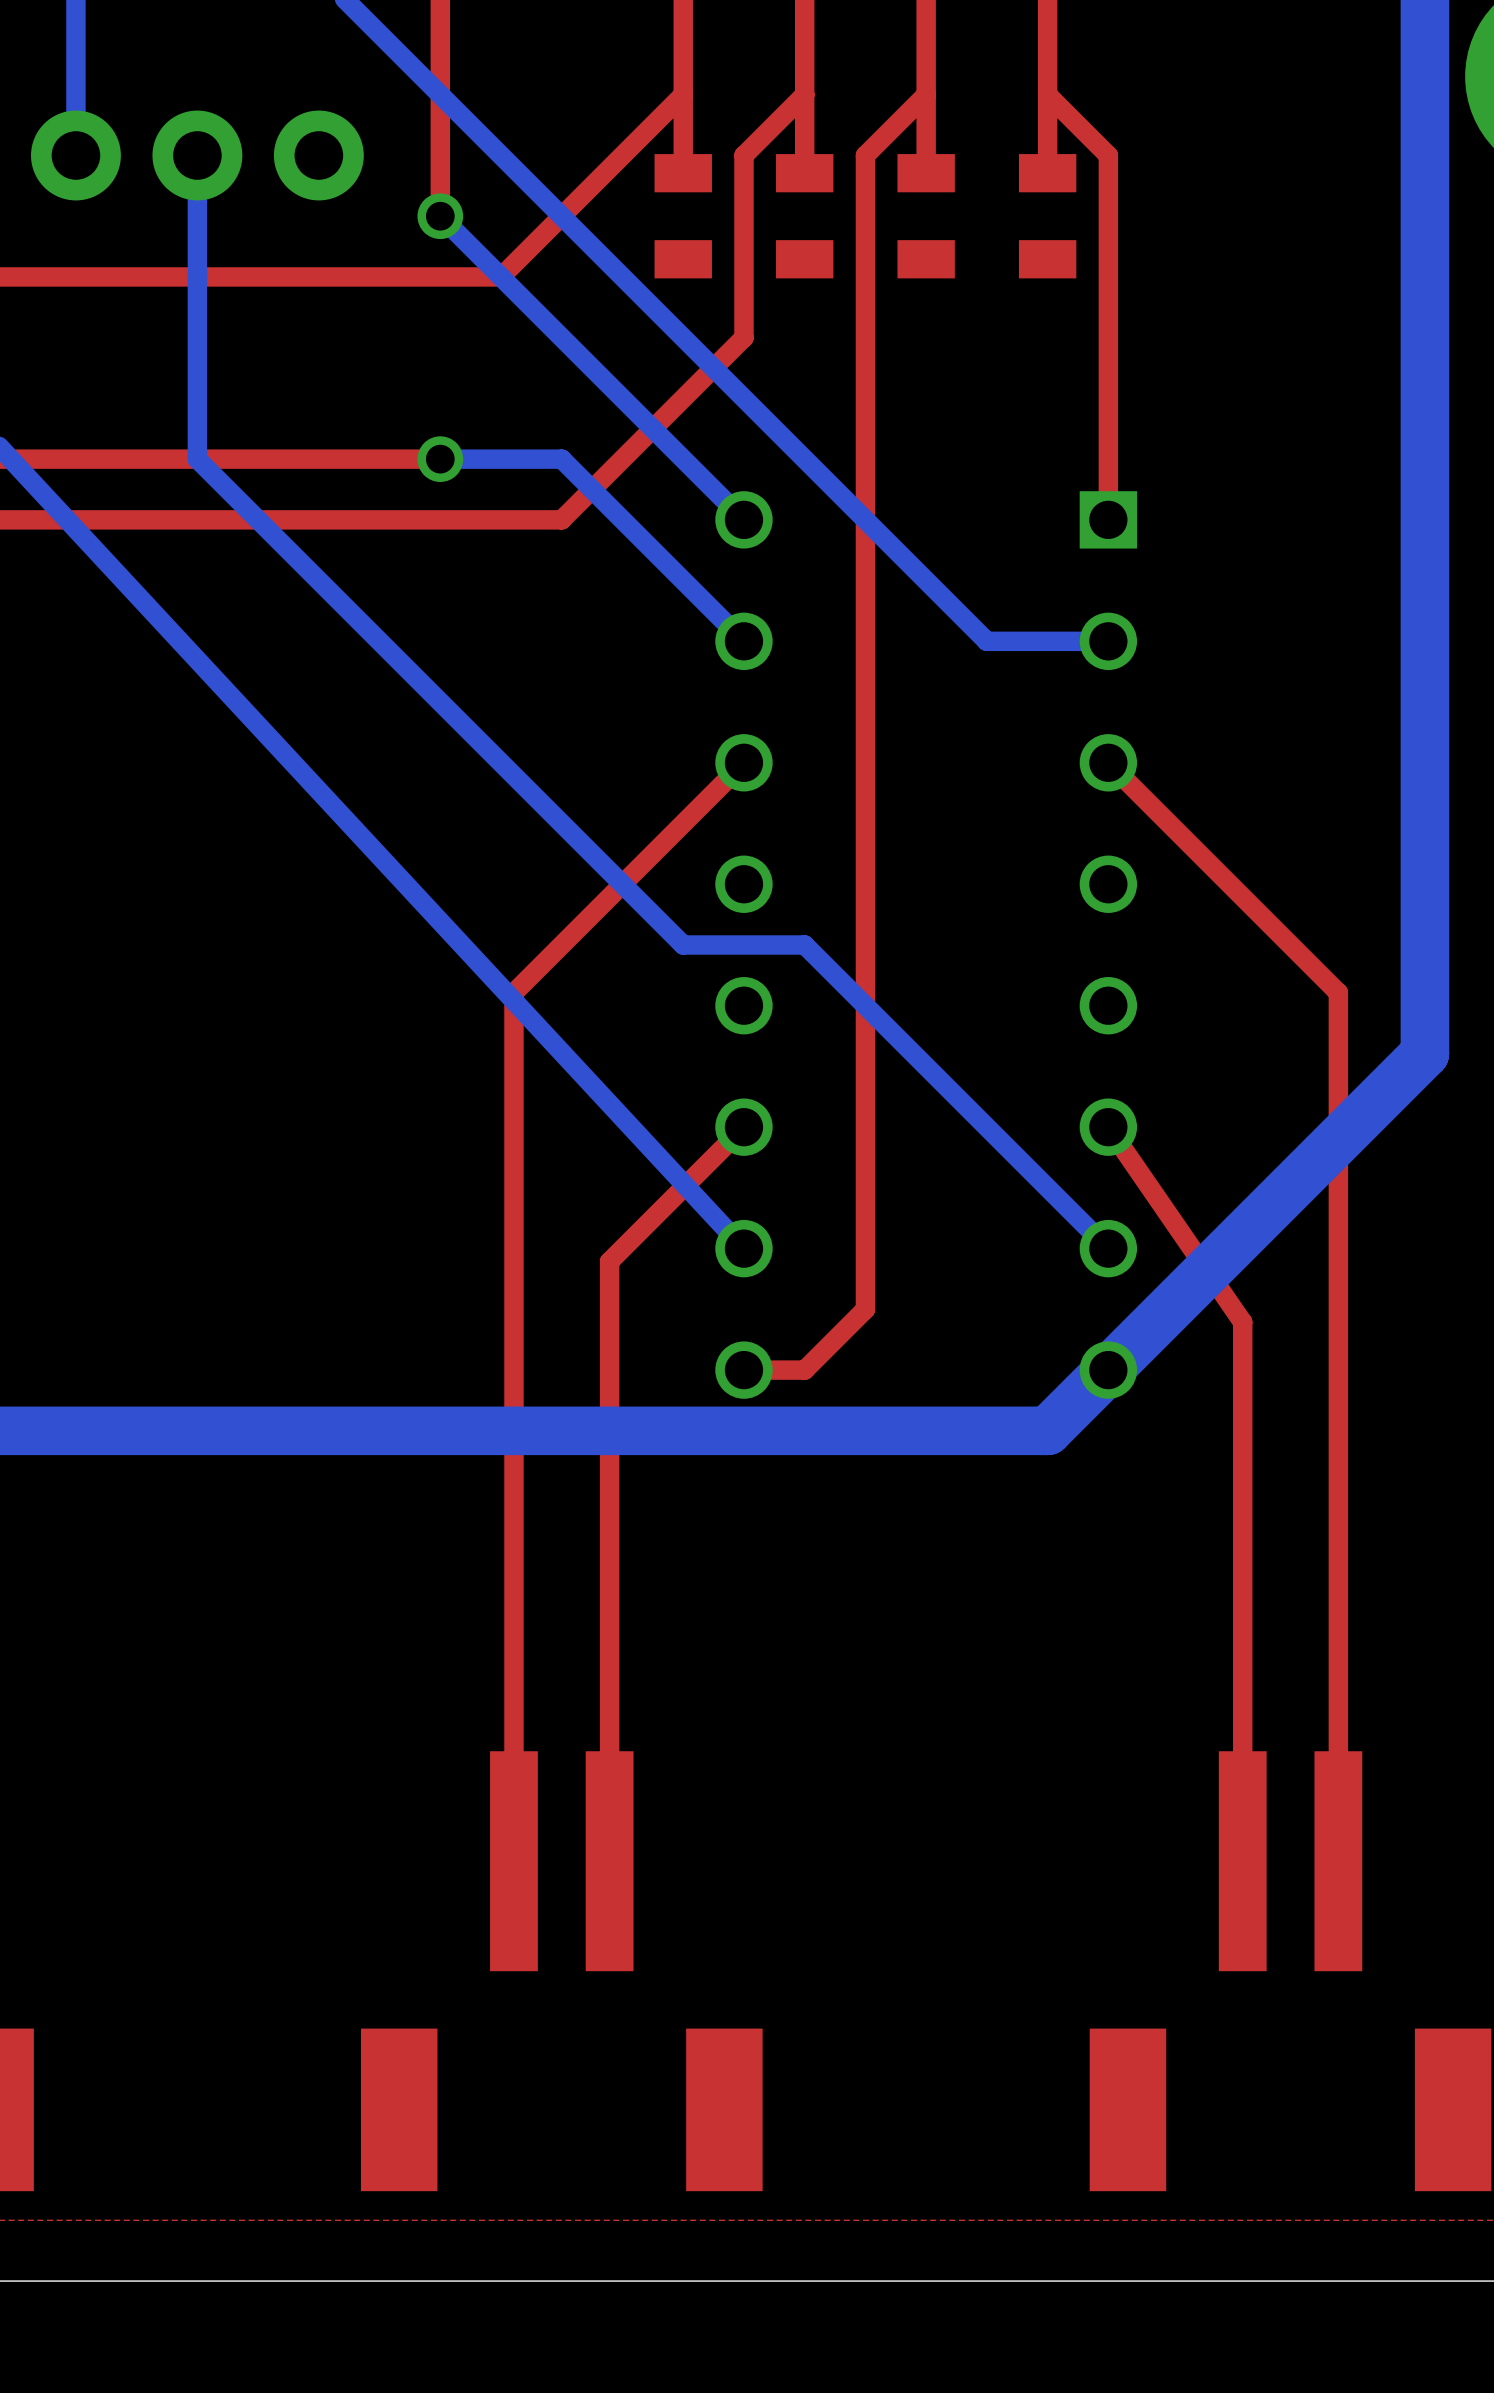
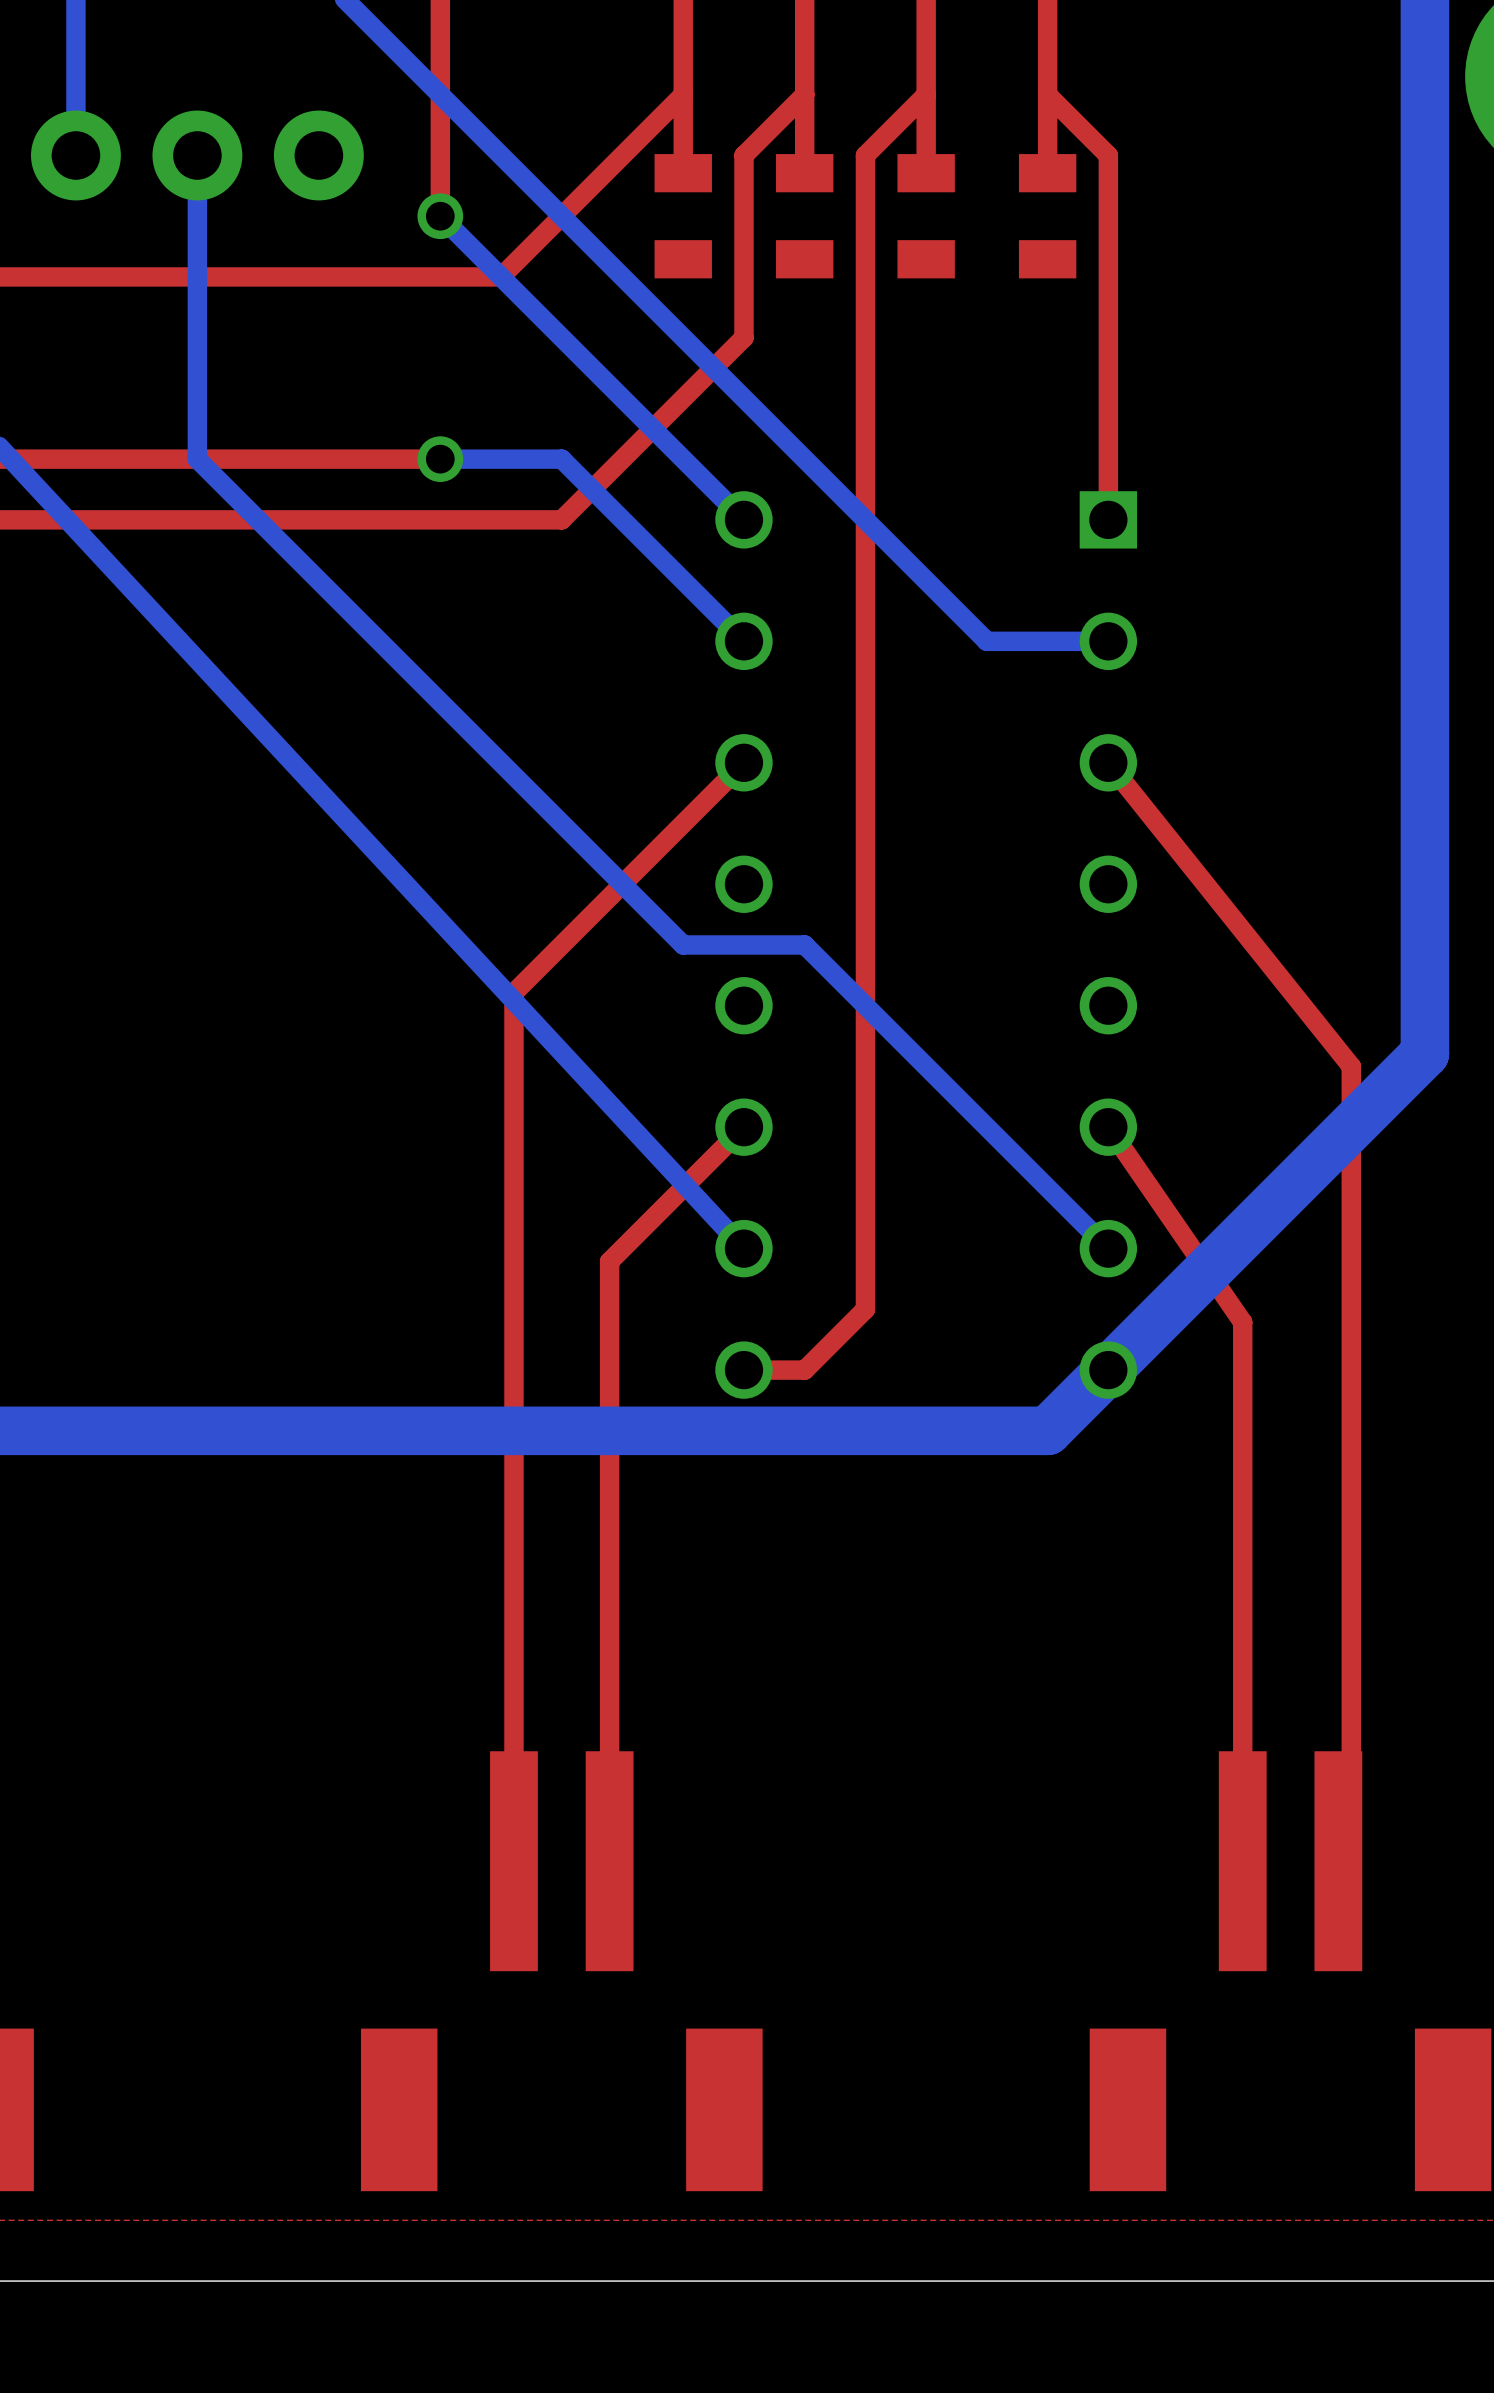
top track: (1108, 762) (1338, 992) (1338, 1861) -> (1108, 762) (1351, 1066) (1351, 1861) (1338, 1861)

